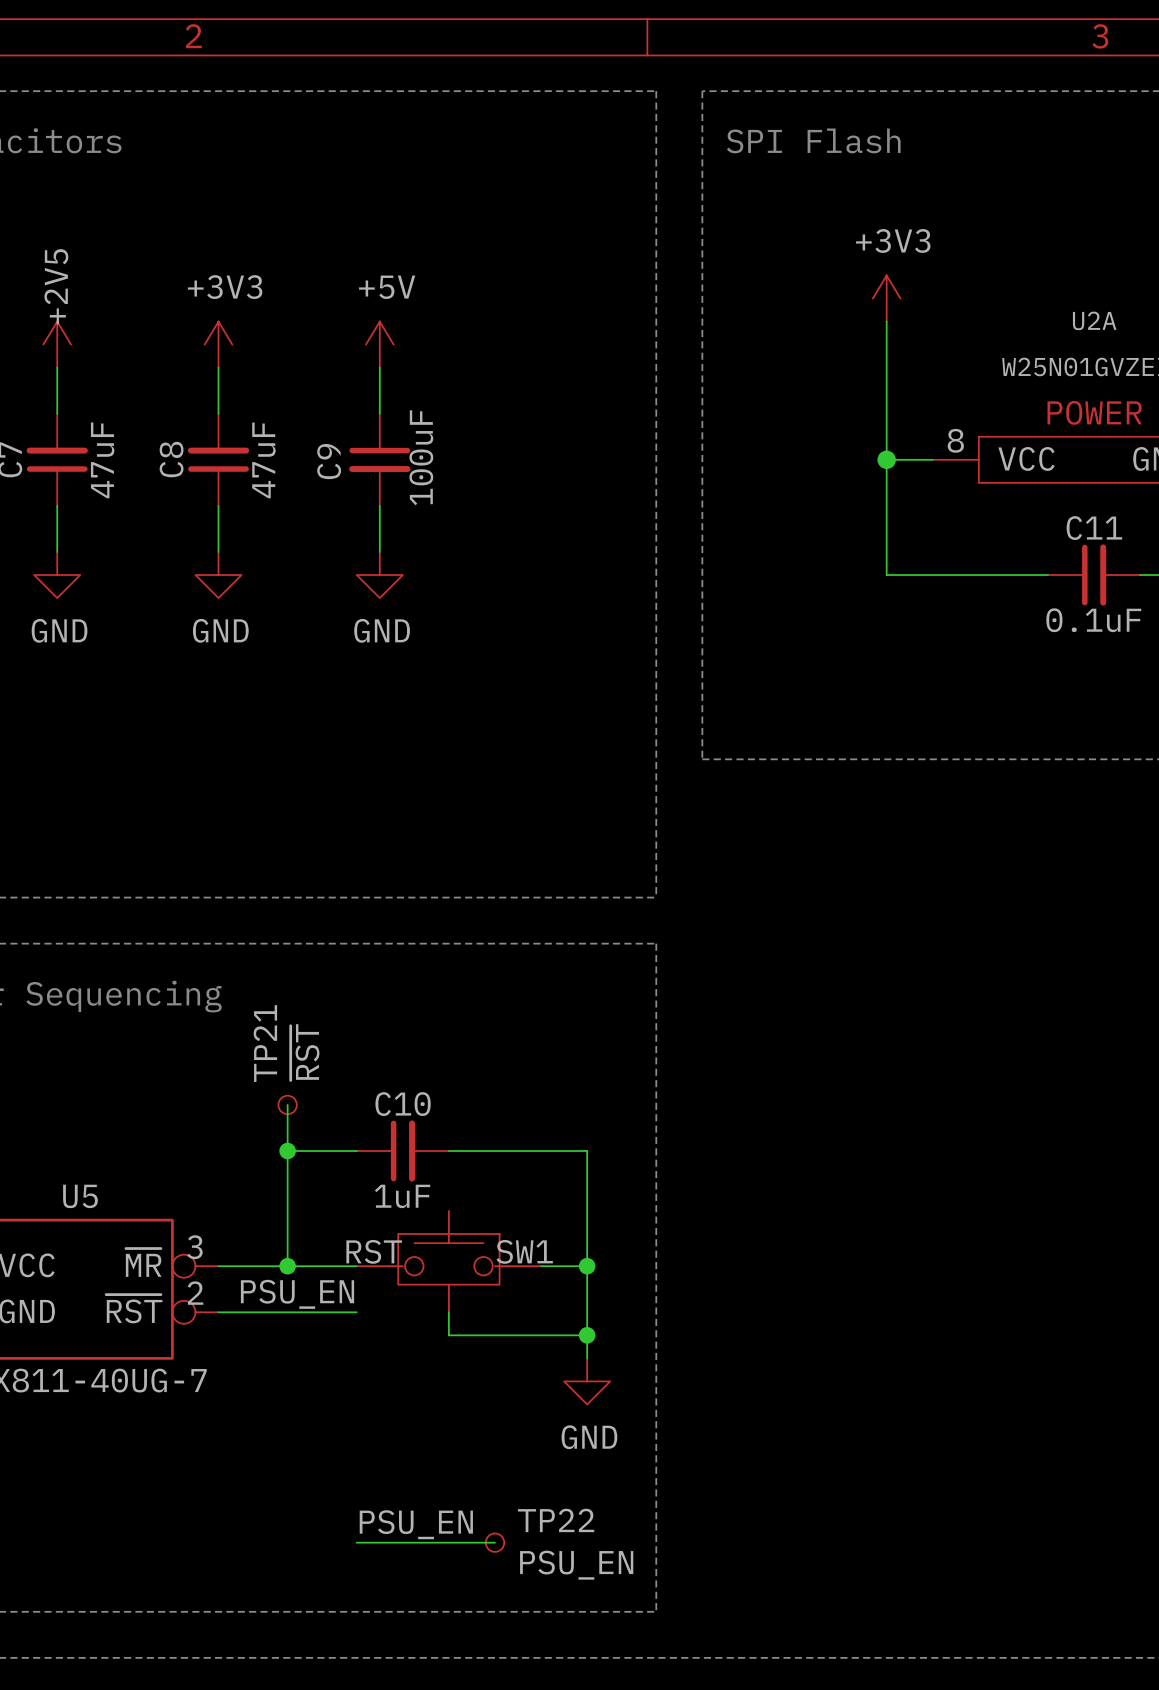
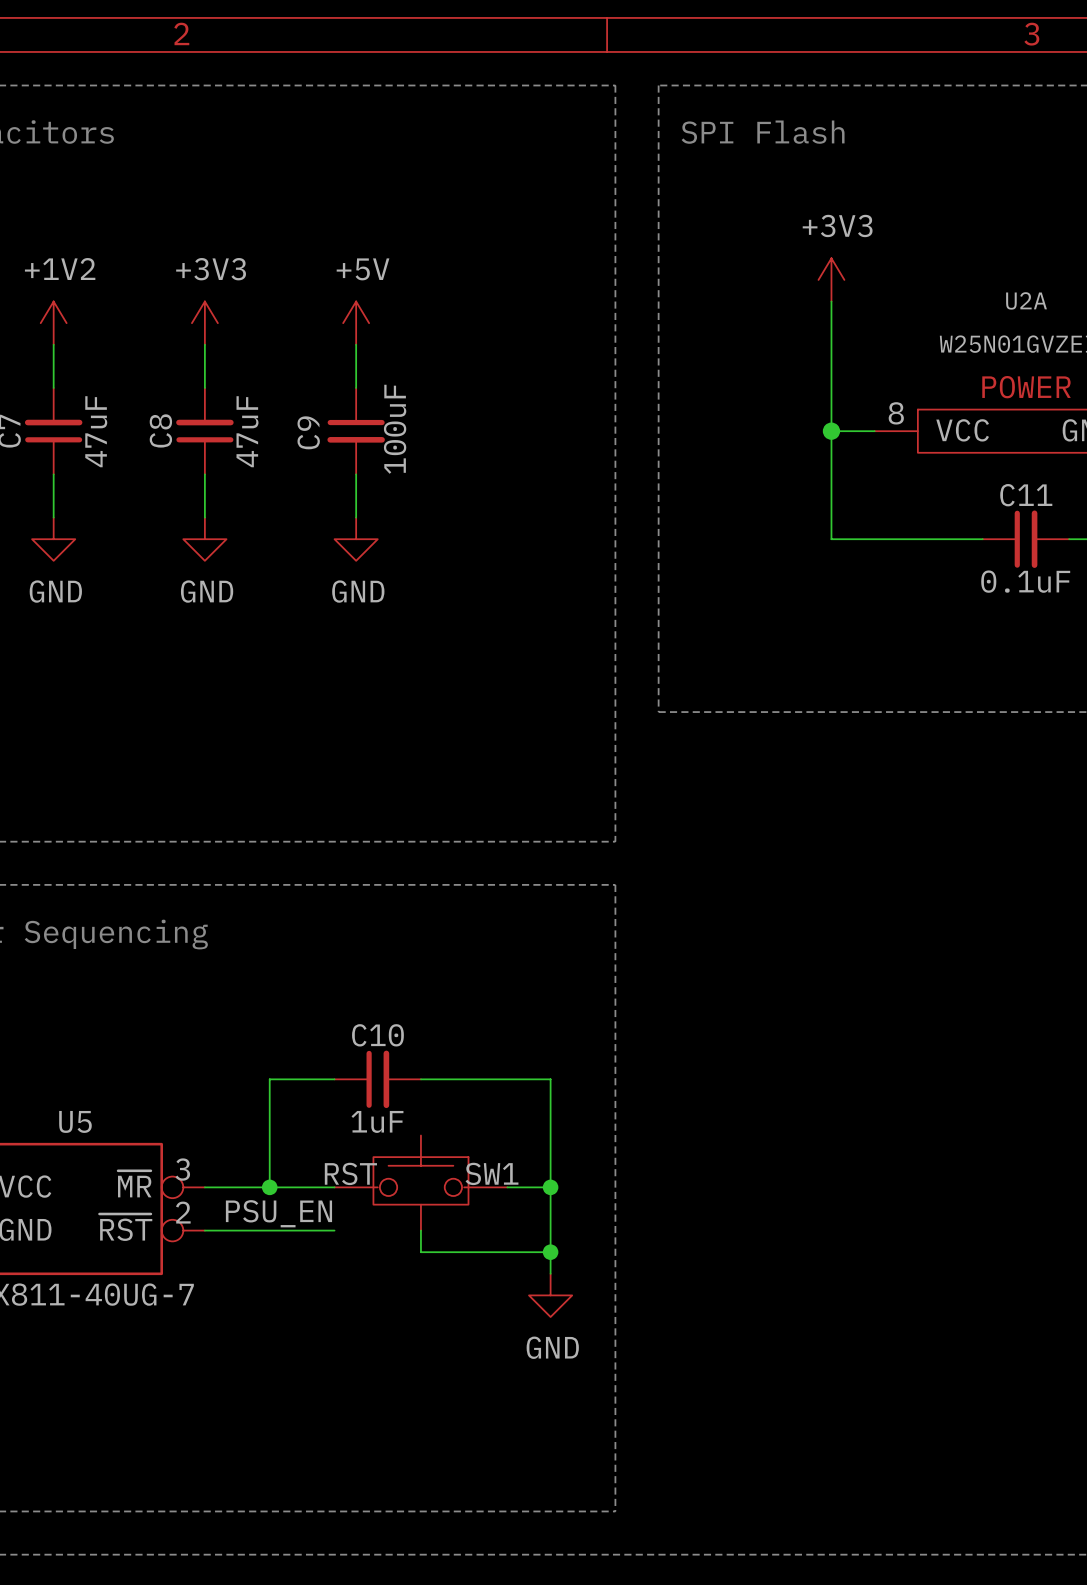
power symbol: +2V5 (57, 344) -> +1V2 (53, 323)
wire: (287, 1104) (287, 1151) -> none
TP21: ~{RST} (287, 1104) -> none
junction: (287, 1151) -> none
label: PSU_EN (416, 1524) -> none
wire: (356, 1542) (494, 1542) -> none
TP22: PSU_EN (494, 1542) -> none

